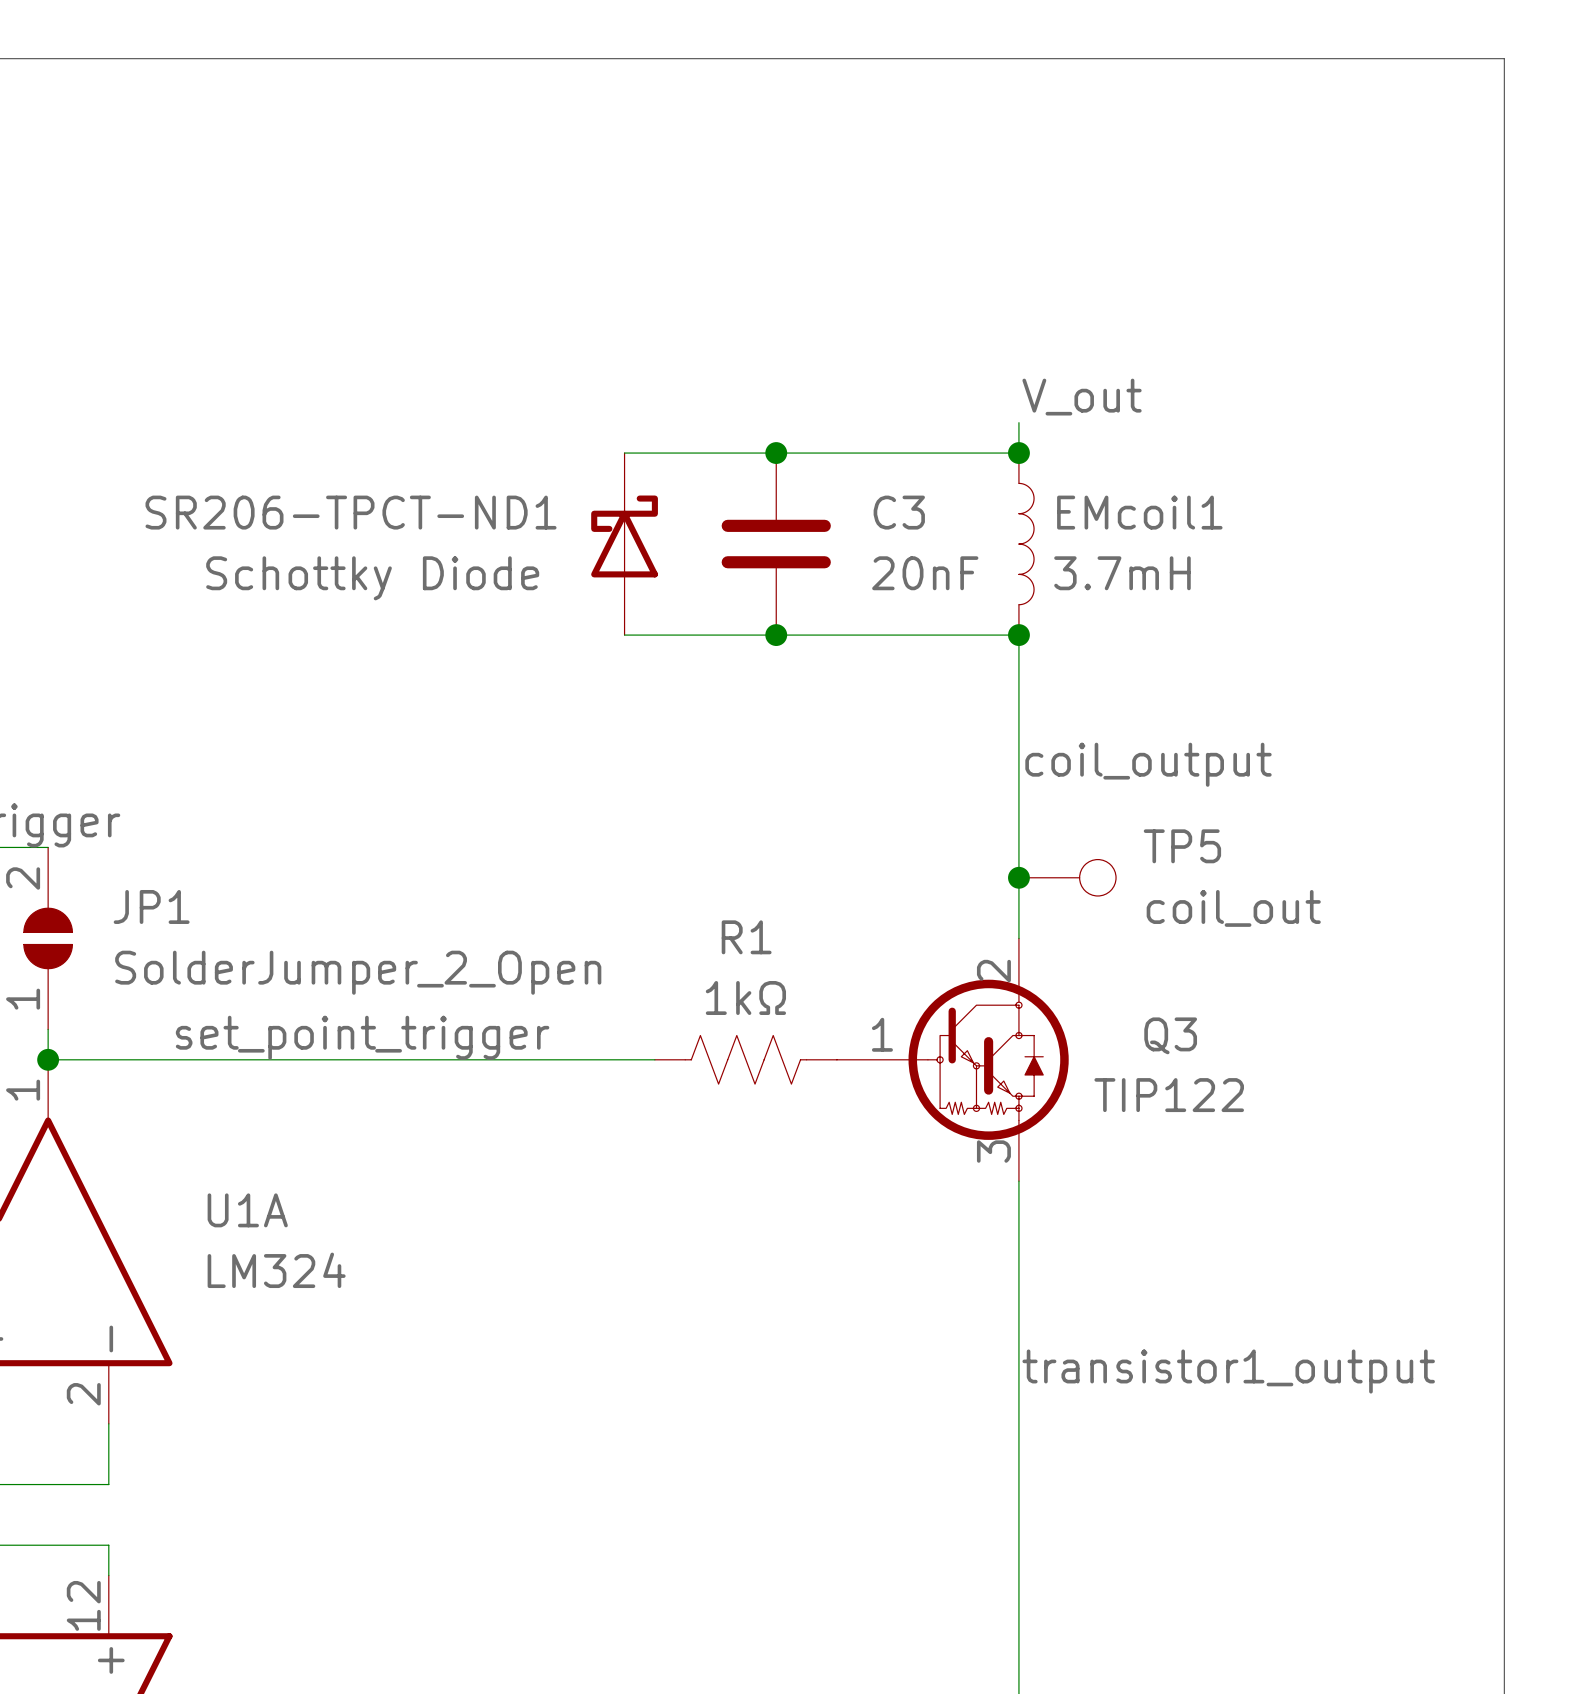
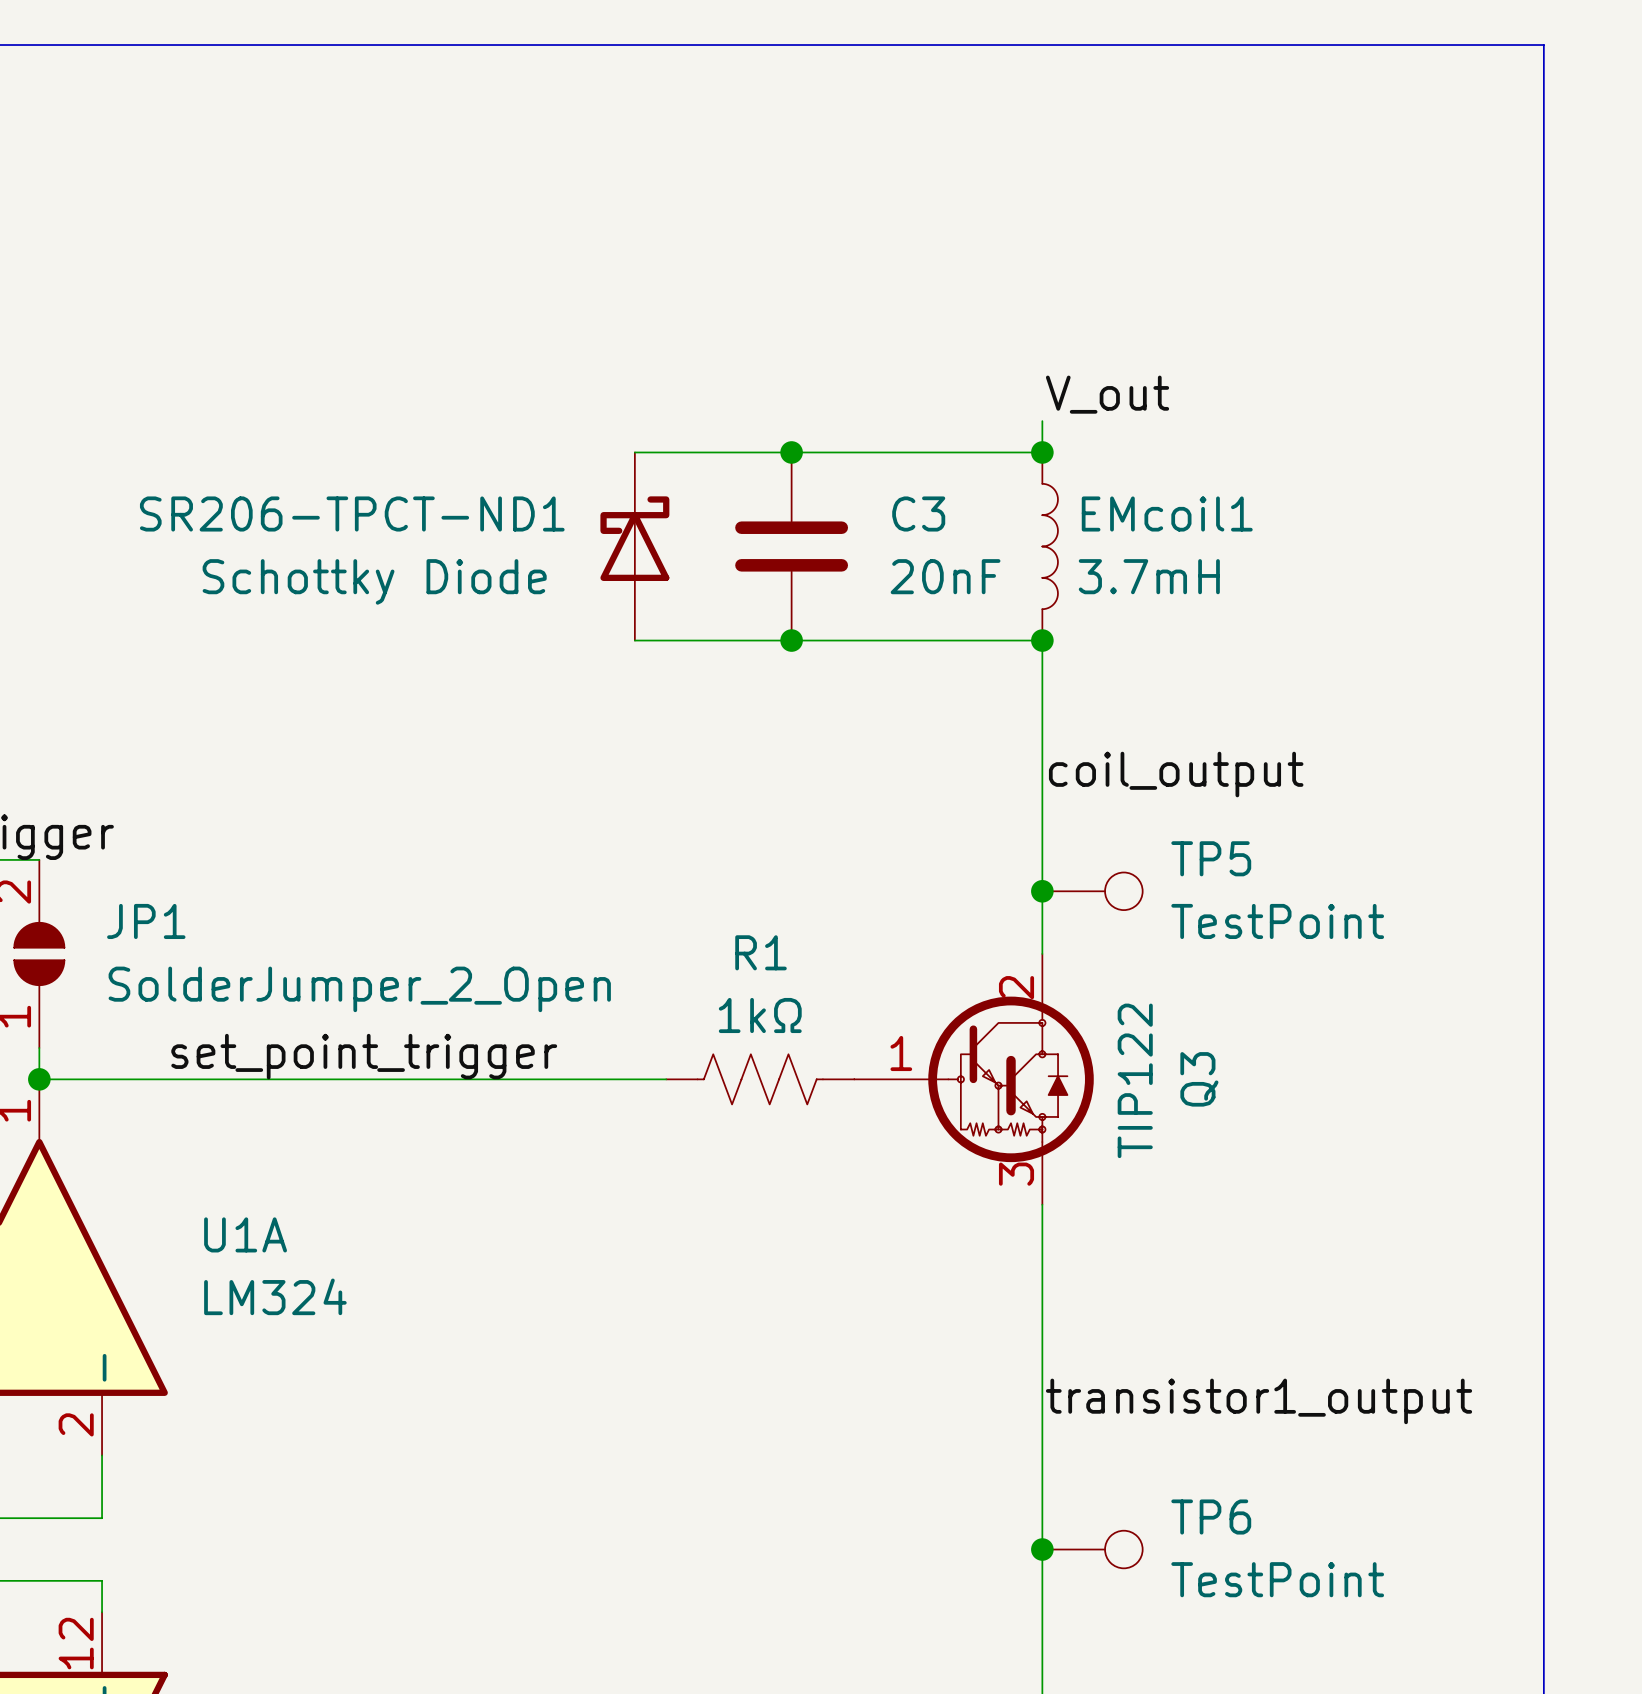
TP5 value: coil_out (1233, 908) -> TestPoint (1277, 921)
Q3 name rotation: 0° (1170, 1035) -> 90° counterclockwise (1199, 1079)
Q3 value rotation: 0° (1169, 1095) -> 90° counterclockwise (1135, 1080)
junction: none -> (1042, 1549)
TP6: none -> TestPoint (1092, 1549)

